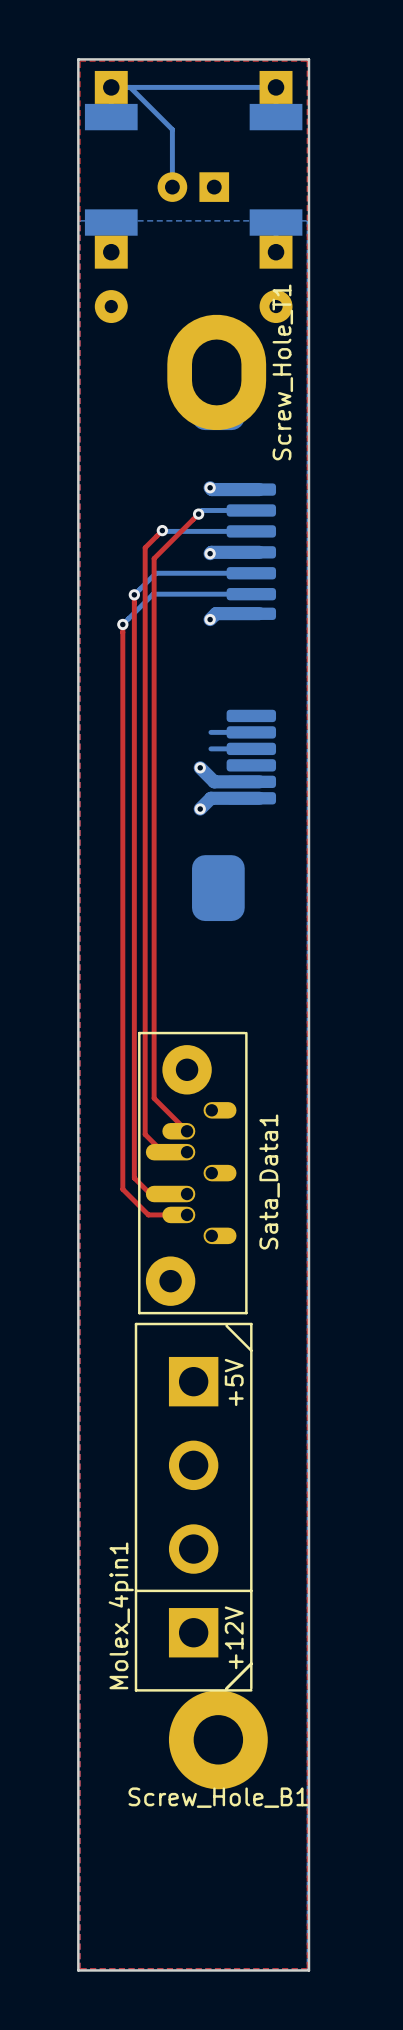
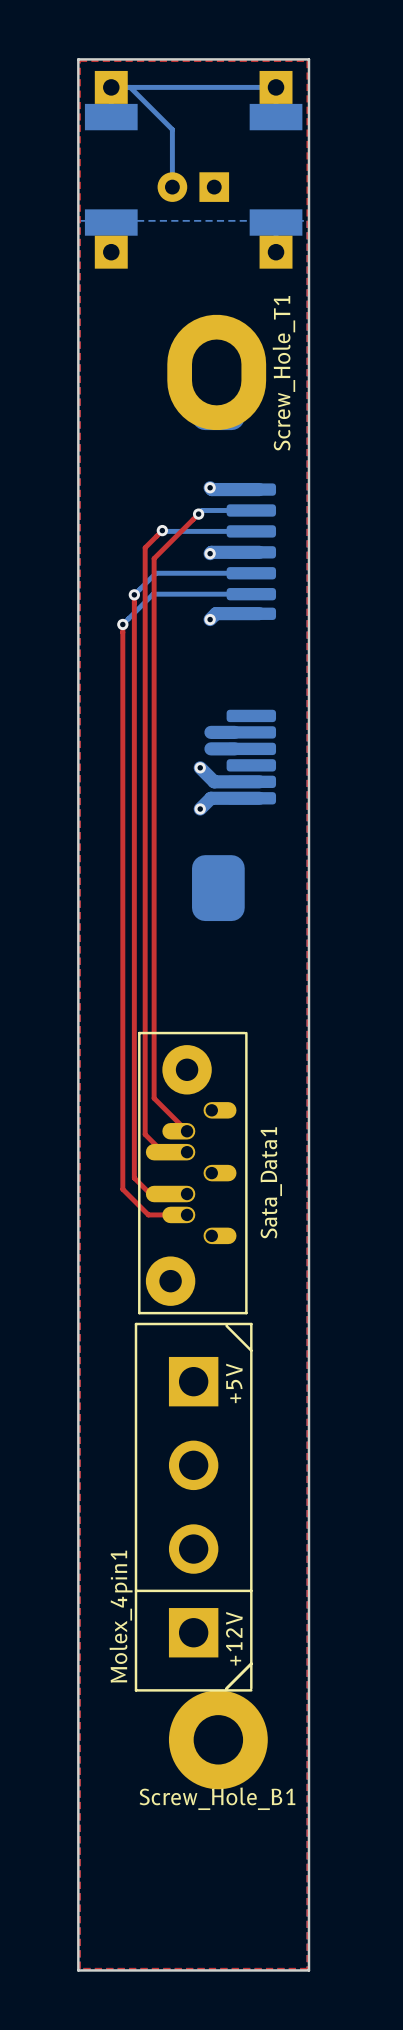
part: (111, 306) -> none
part: (276, 306) -> none
bottom track width: thin (210, 732) (234, 732) -> thick (210, 732) (234, 732)
bottom track width: thin (210, 748) (234, 748) -> thick (210, 748) (234, 748)

